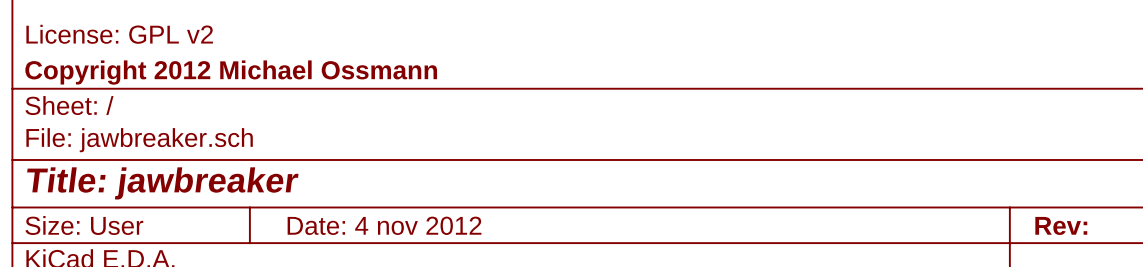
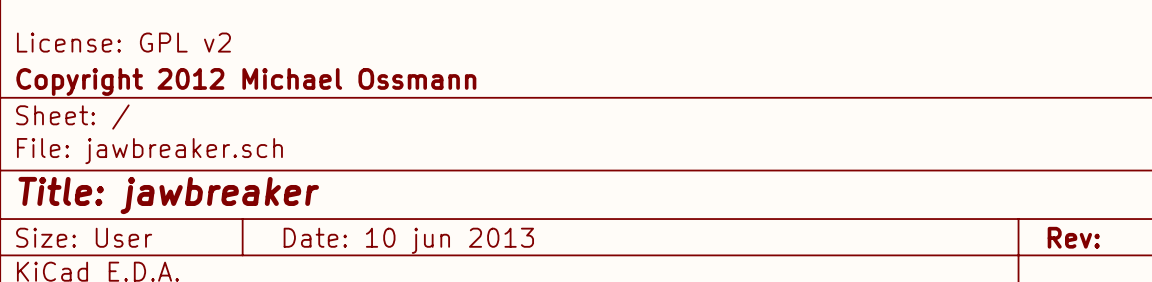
title block: Date: 4 nov 2012 (384, 225) -> Date: 10 jun 2013 (408, 240)

